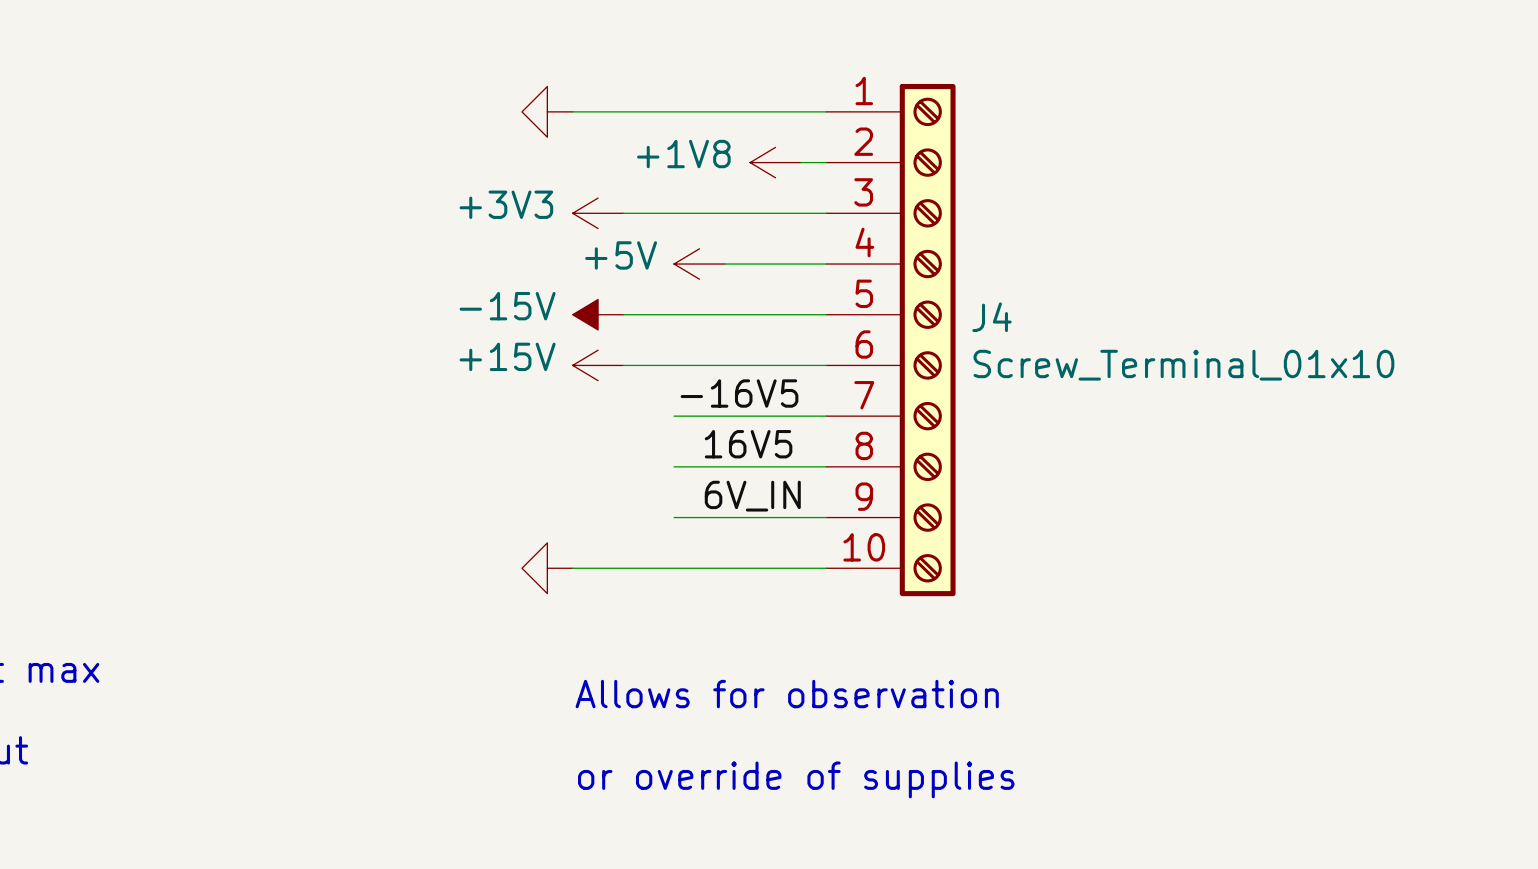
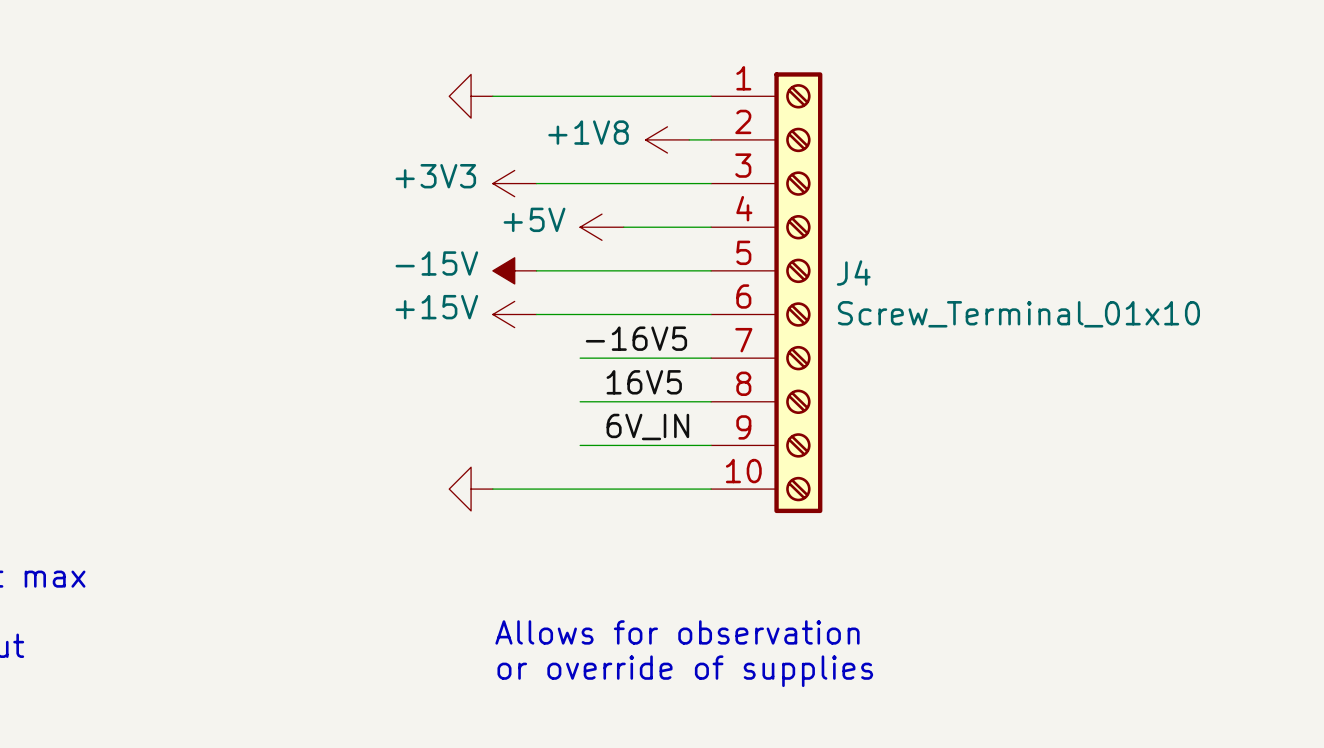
text position: Allows for observation (787, 694) -> Allows for observation (677, 632)

